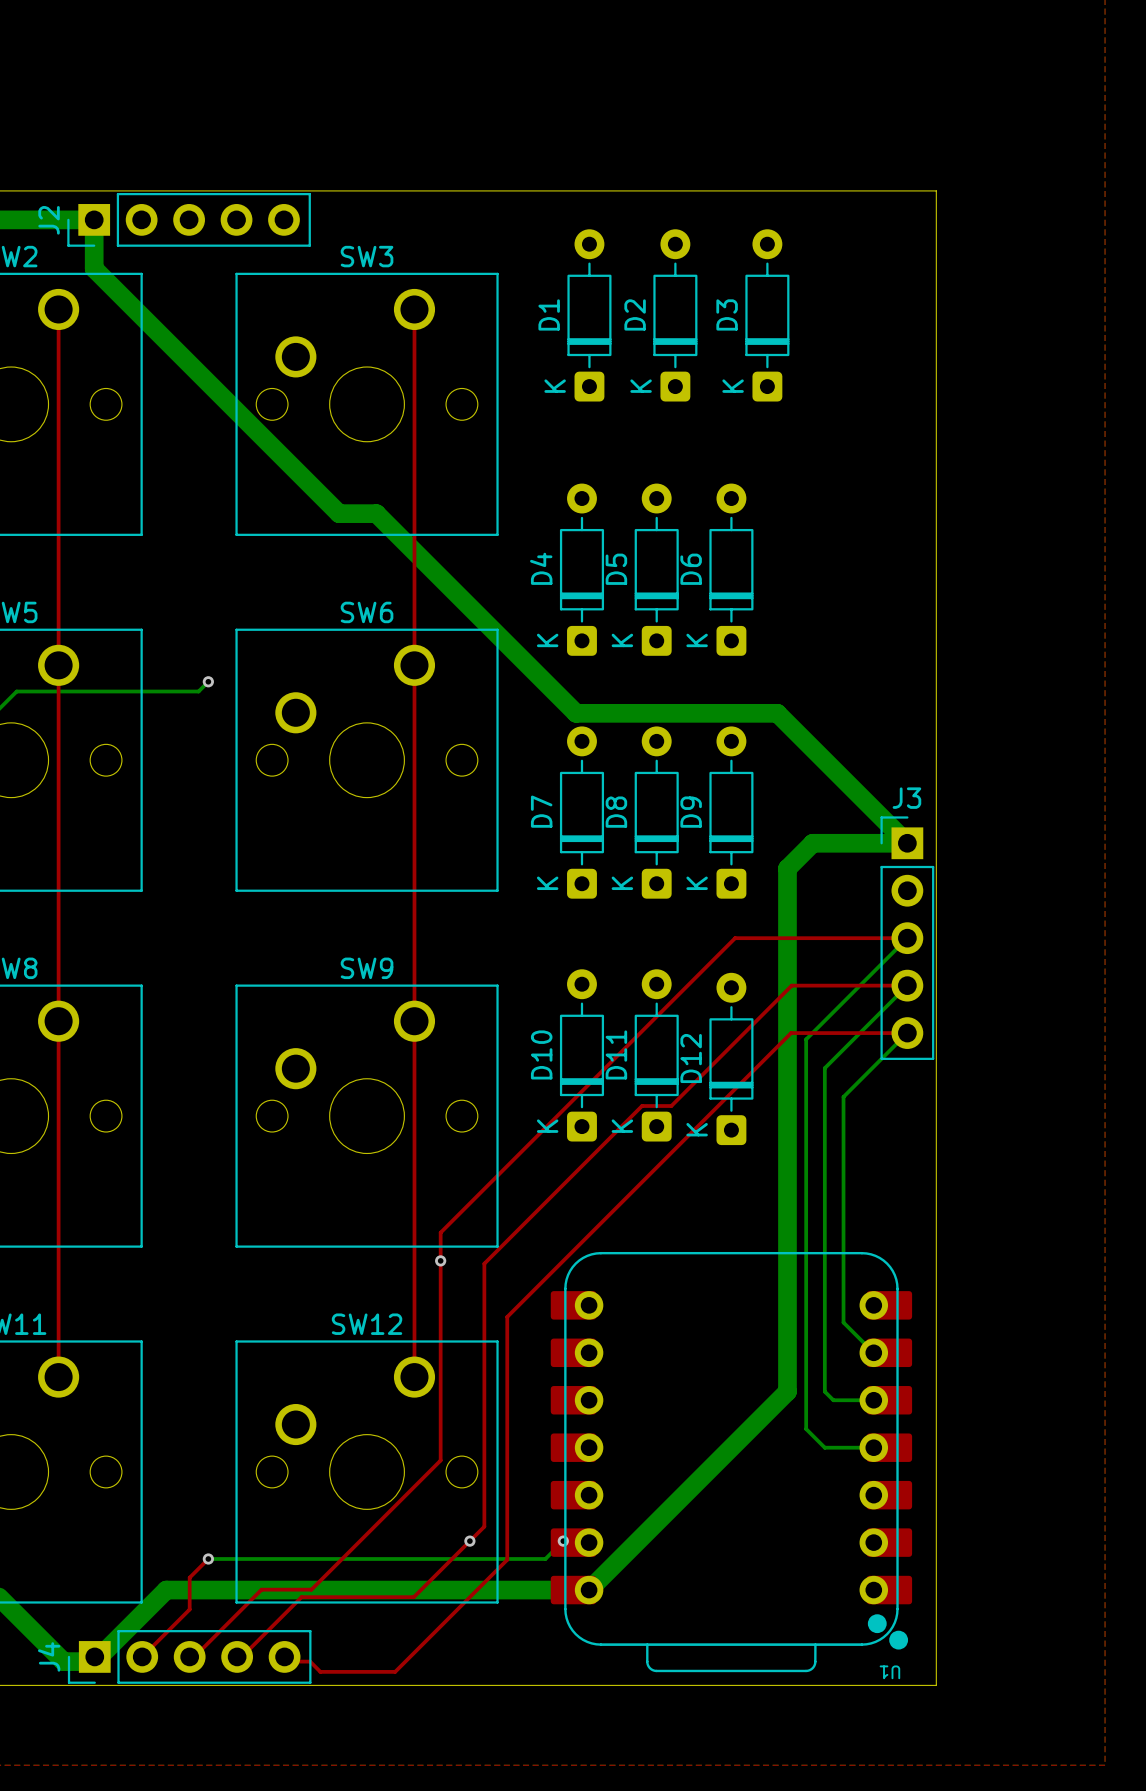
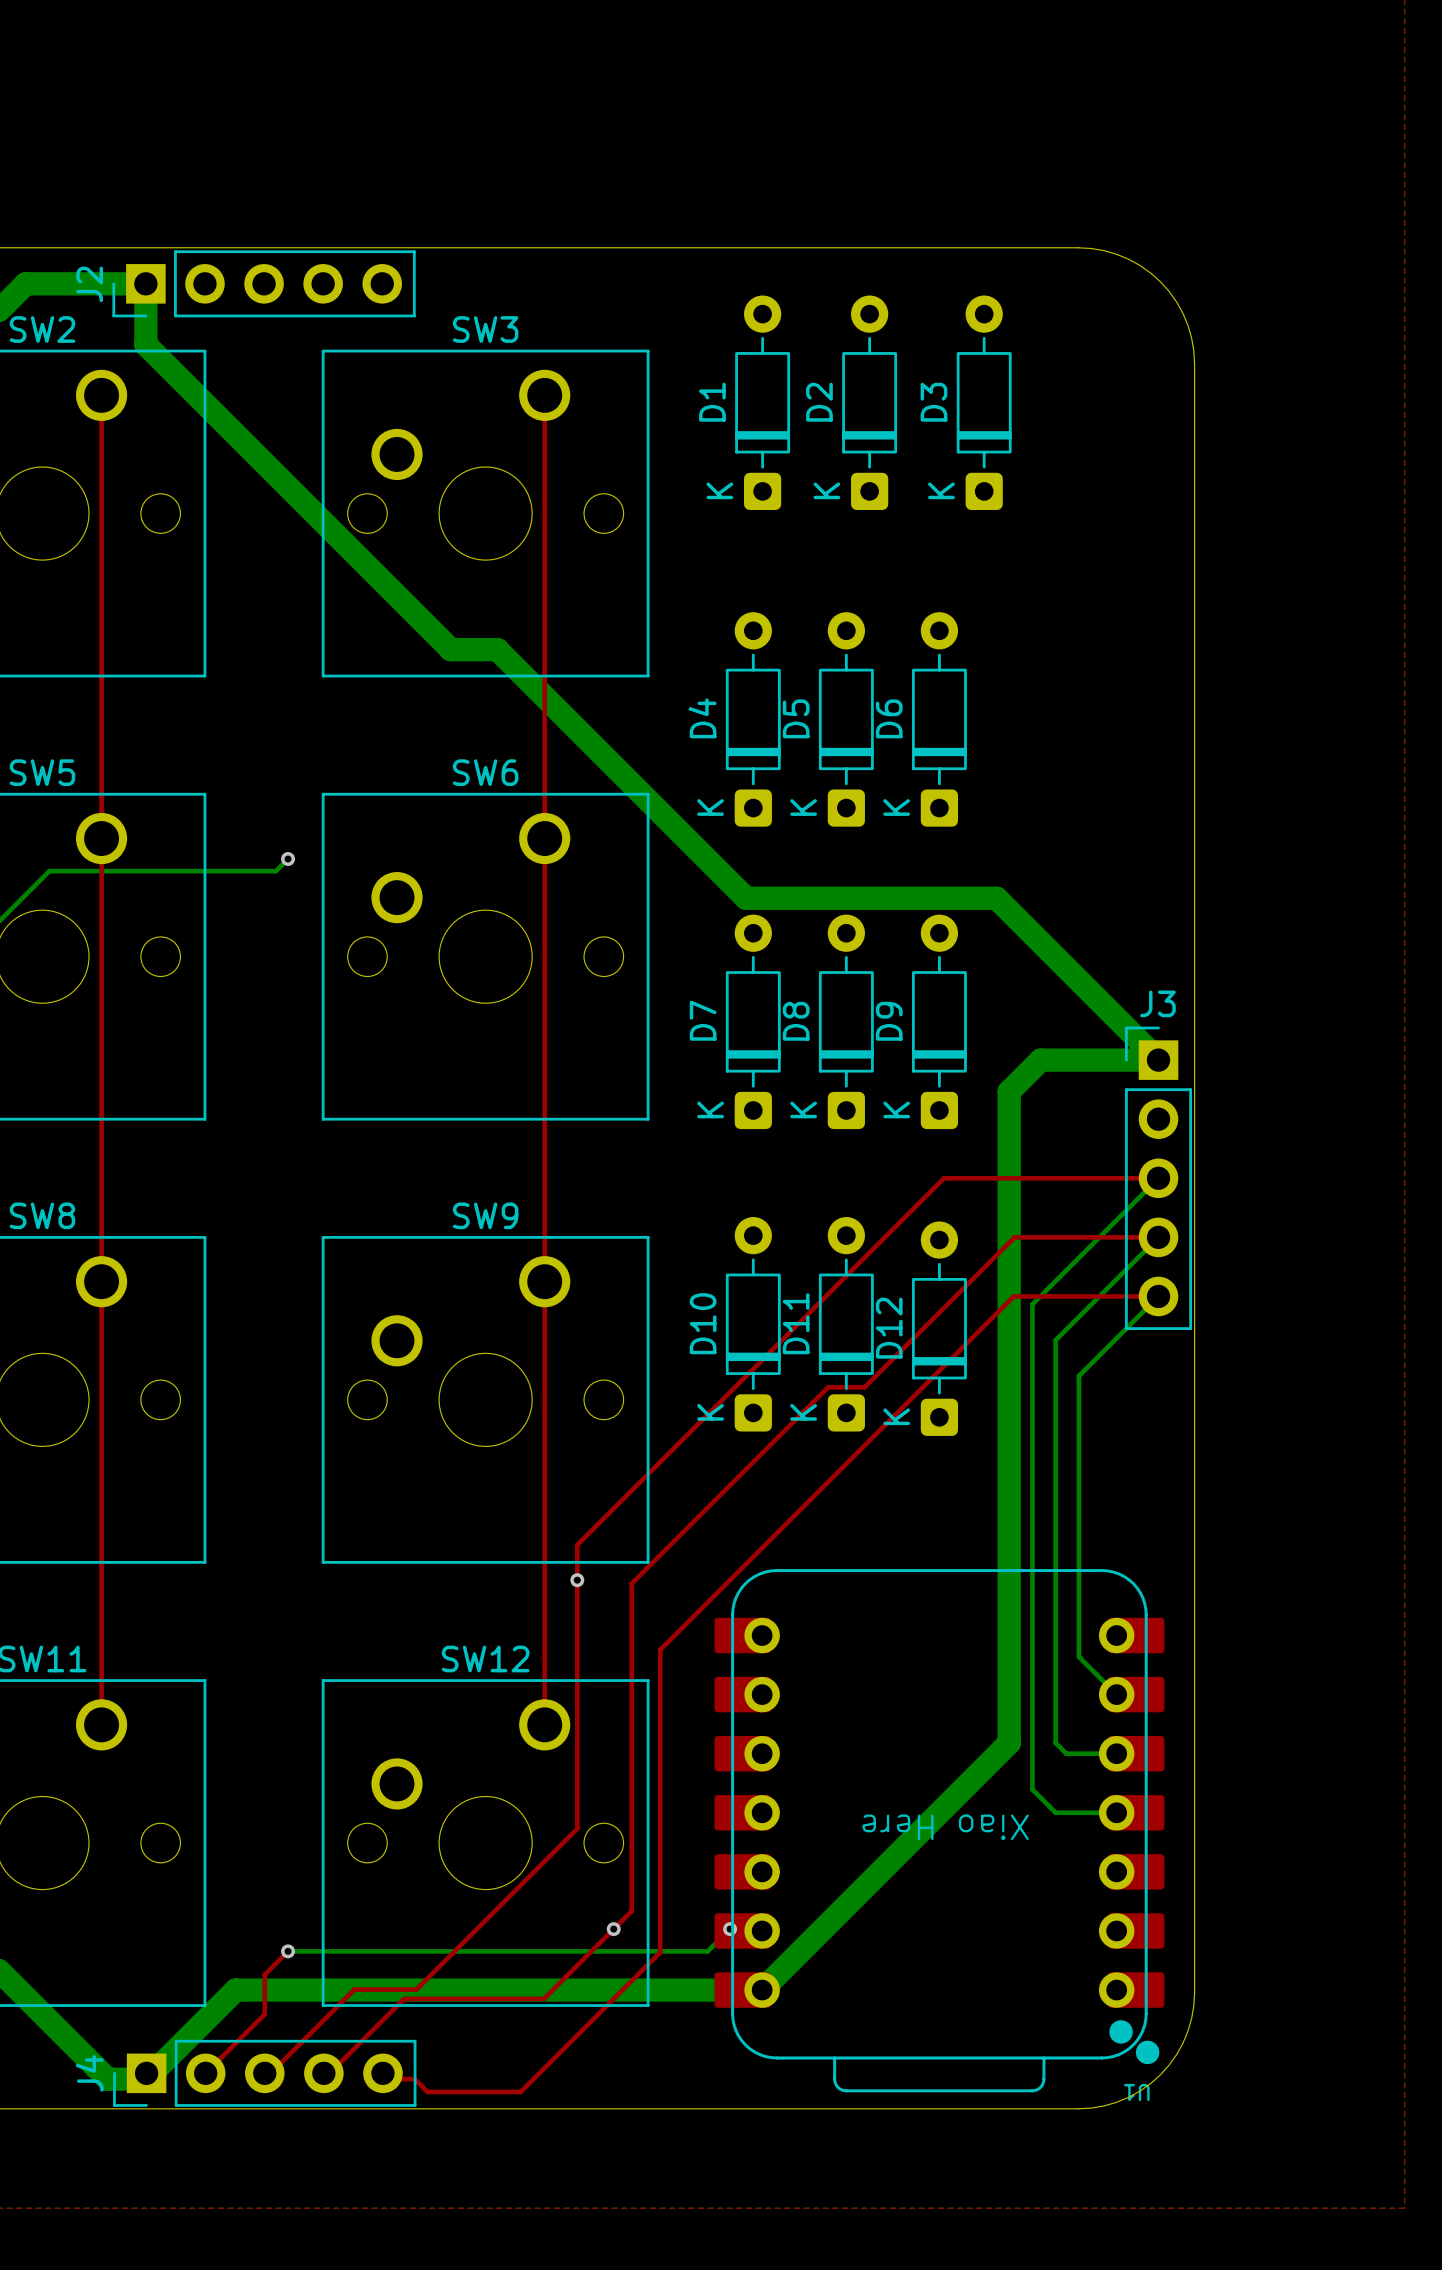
board edge: (842, 190) (936, 190) (936, 284) -> (1078, 247) (1104, 250) (1128, 259) (1160, 281) (1183, 313) (1191, 338) (1194, 364)
text: none -> Xiao Here (945, 1827)
board edge: (936, 1592) (936, 1685) (842, 1685) -> (1194, 1992) (1191, 2018) (1183, 2042) (1160, 2074) (1140, 2090) (1116, 2102) (1078, 2108)

